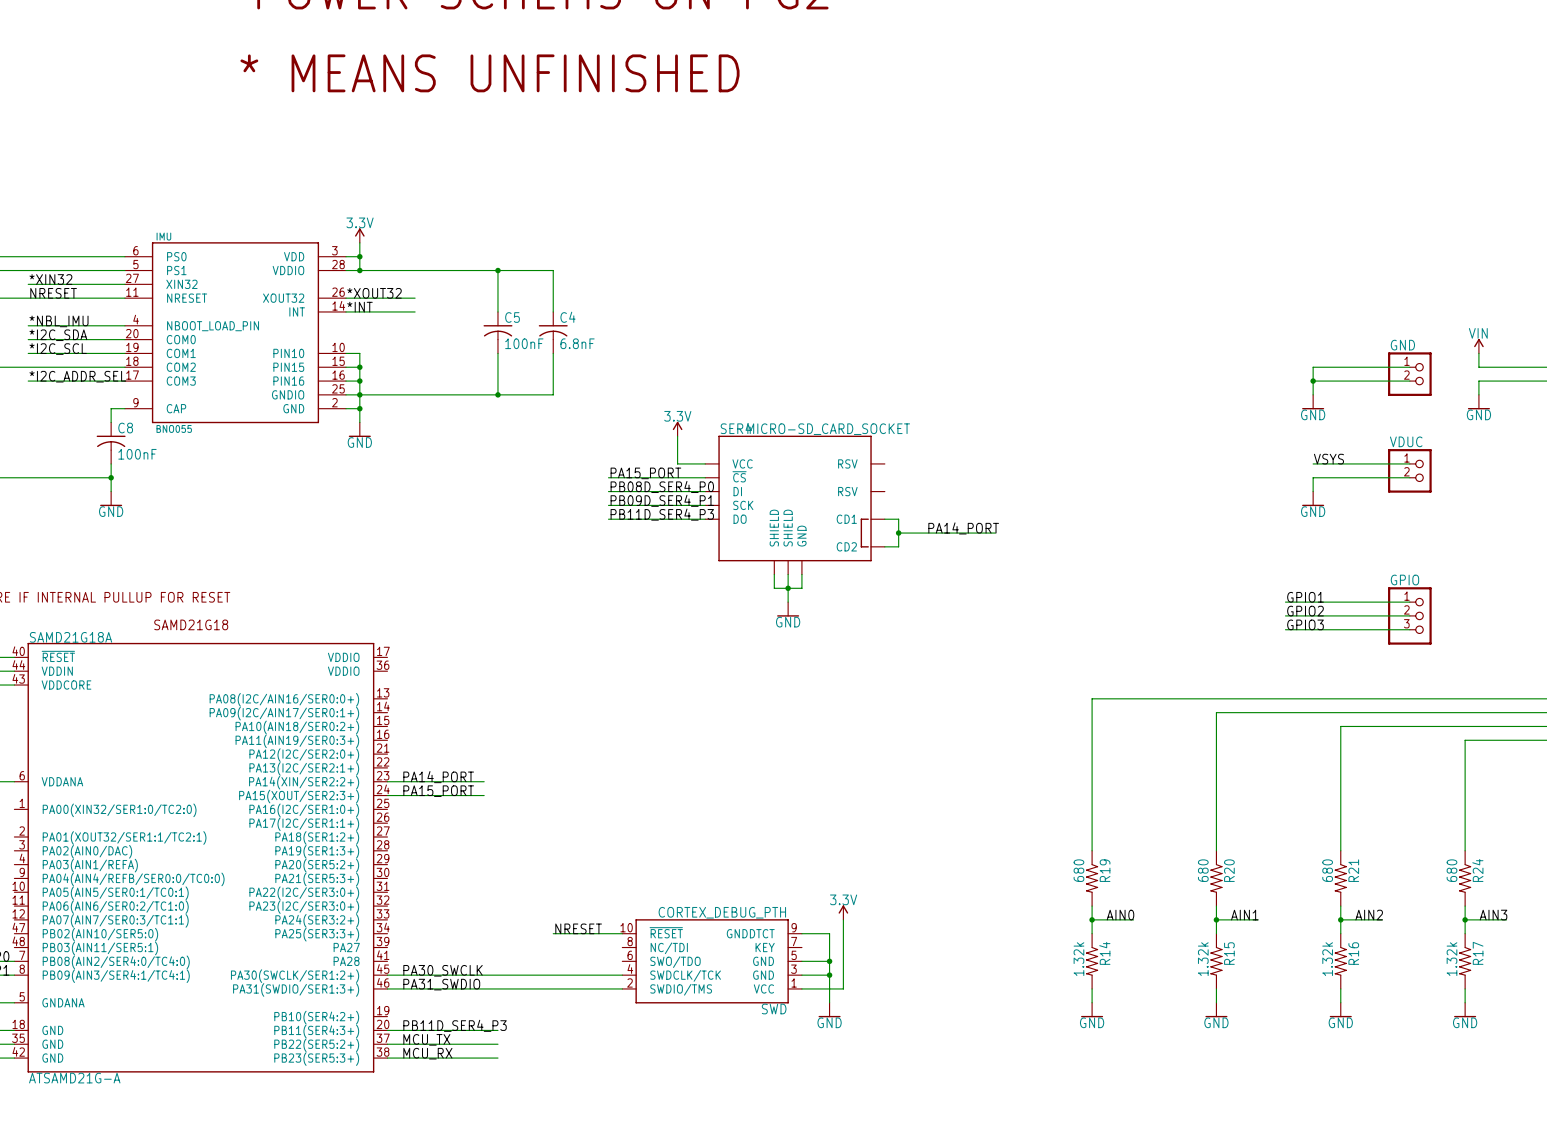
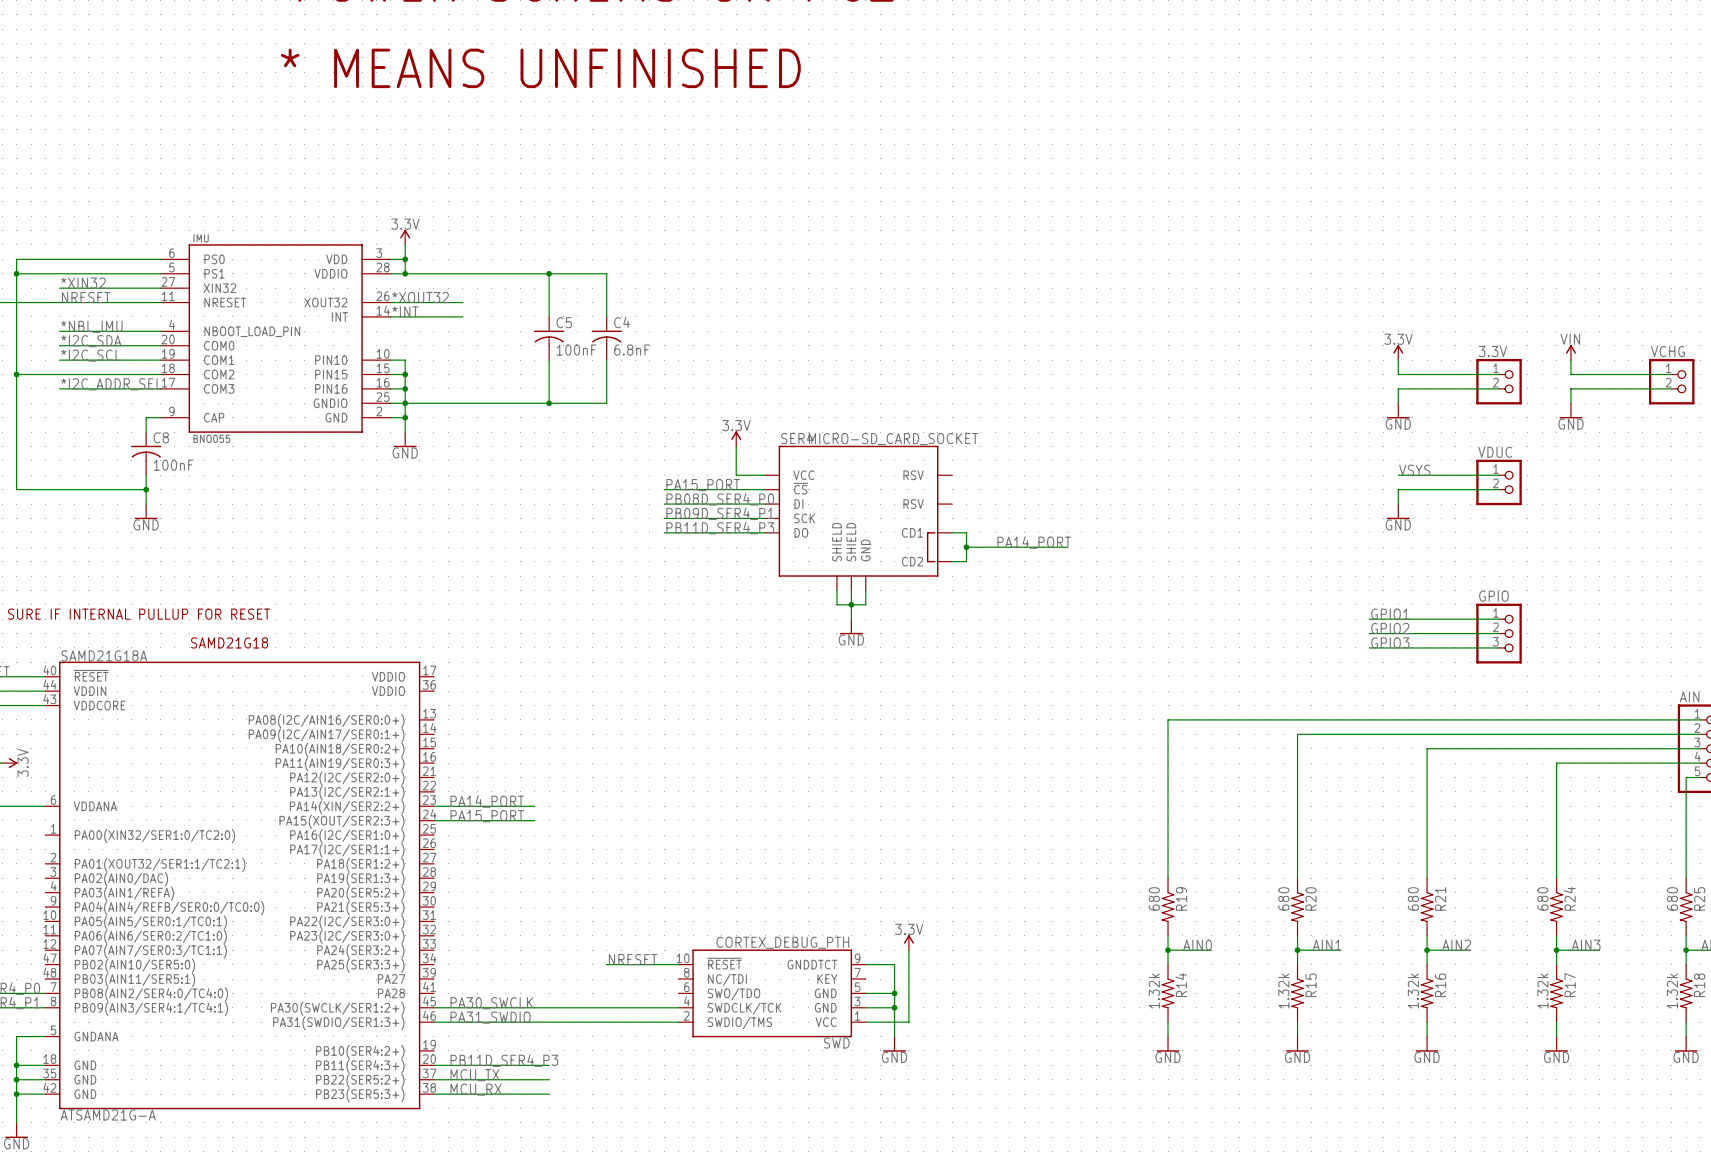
GND name: GND (1402, 345) -> 3.3V (1492, 351)
power symbol: none -> 3.3V (1398, 352)
wire: (1313, 367) (1313, 381) -> (1398, 374) (1398, 360)
junction: (1313, 381) -> none

